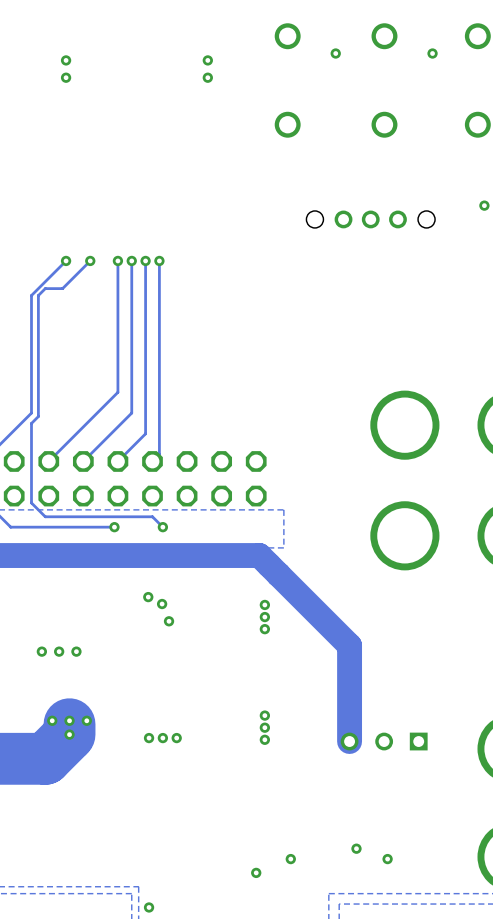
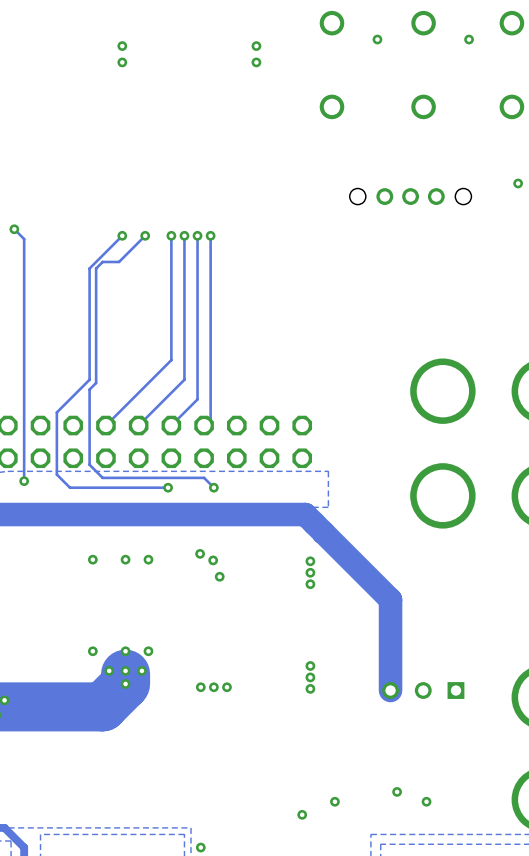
via: none -> (92, 559)
via: none -> (125, 559)
via: none -> (148, 559)
via: (41, 651) -> none
via: (59, 651) -> none
via: (76, 651) -> none
via: none -> (92, 651)
via: none -> (125, 651)
via: none -> (148, 651)

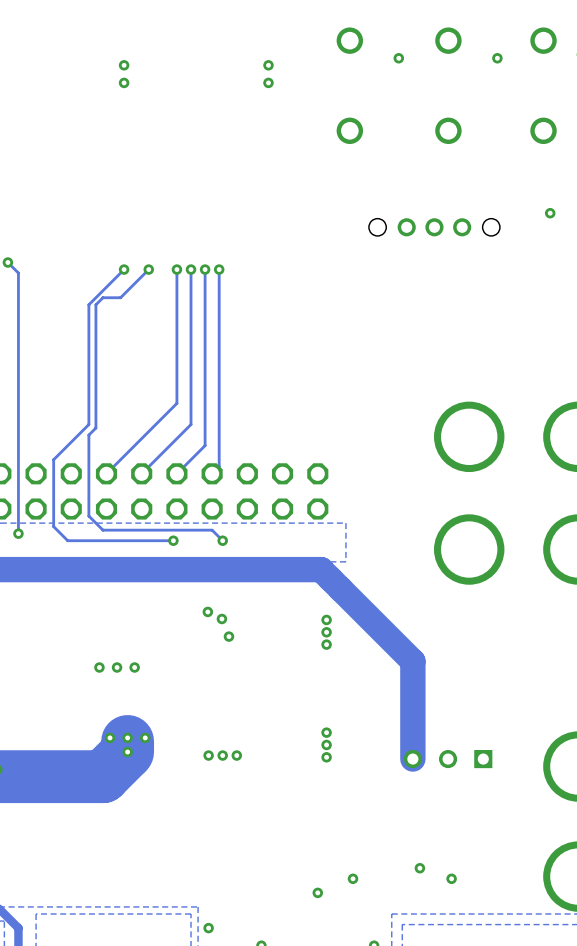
via: (92, 559) -> none
via: (125, 559) -> none
via: (148, 559) -> none
via: none -> (99, 667)
via: none -> (117, 667)
via: none -> (134, 667)
via: (92, 651) -> none
via: (125, 651) -> none
via: (148, 651) -> none

